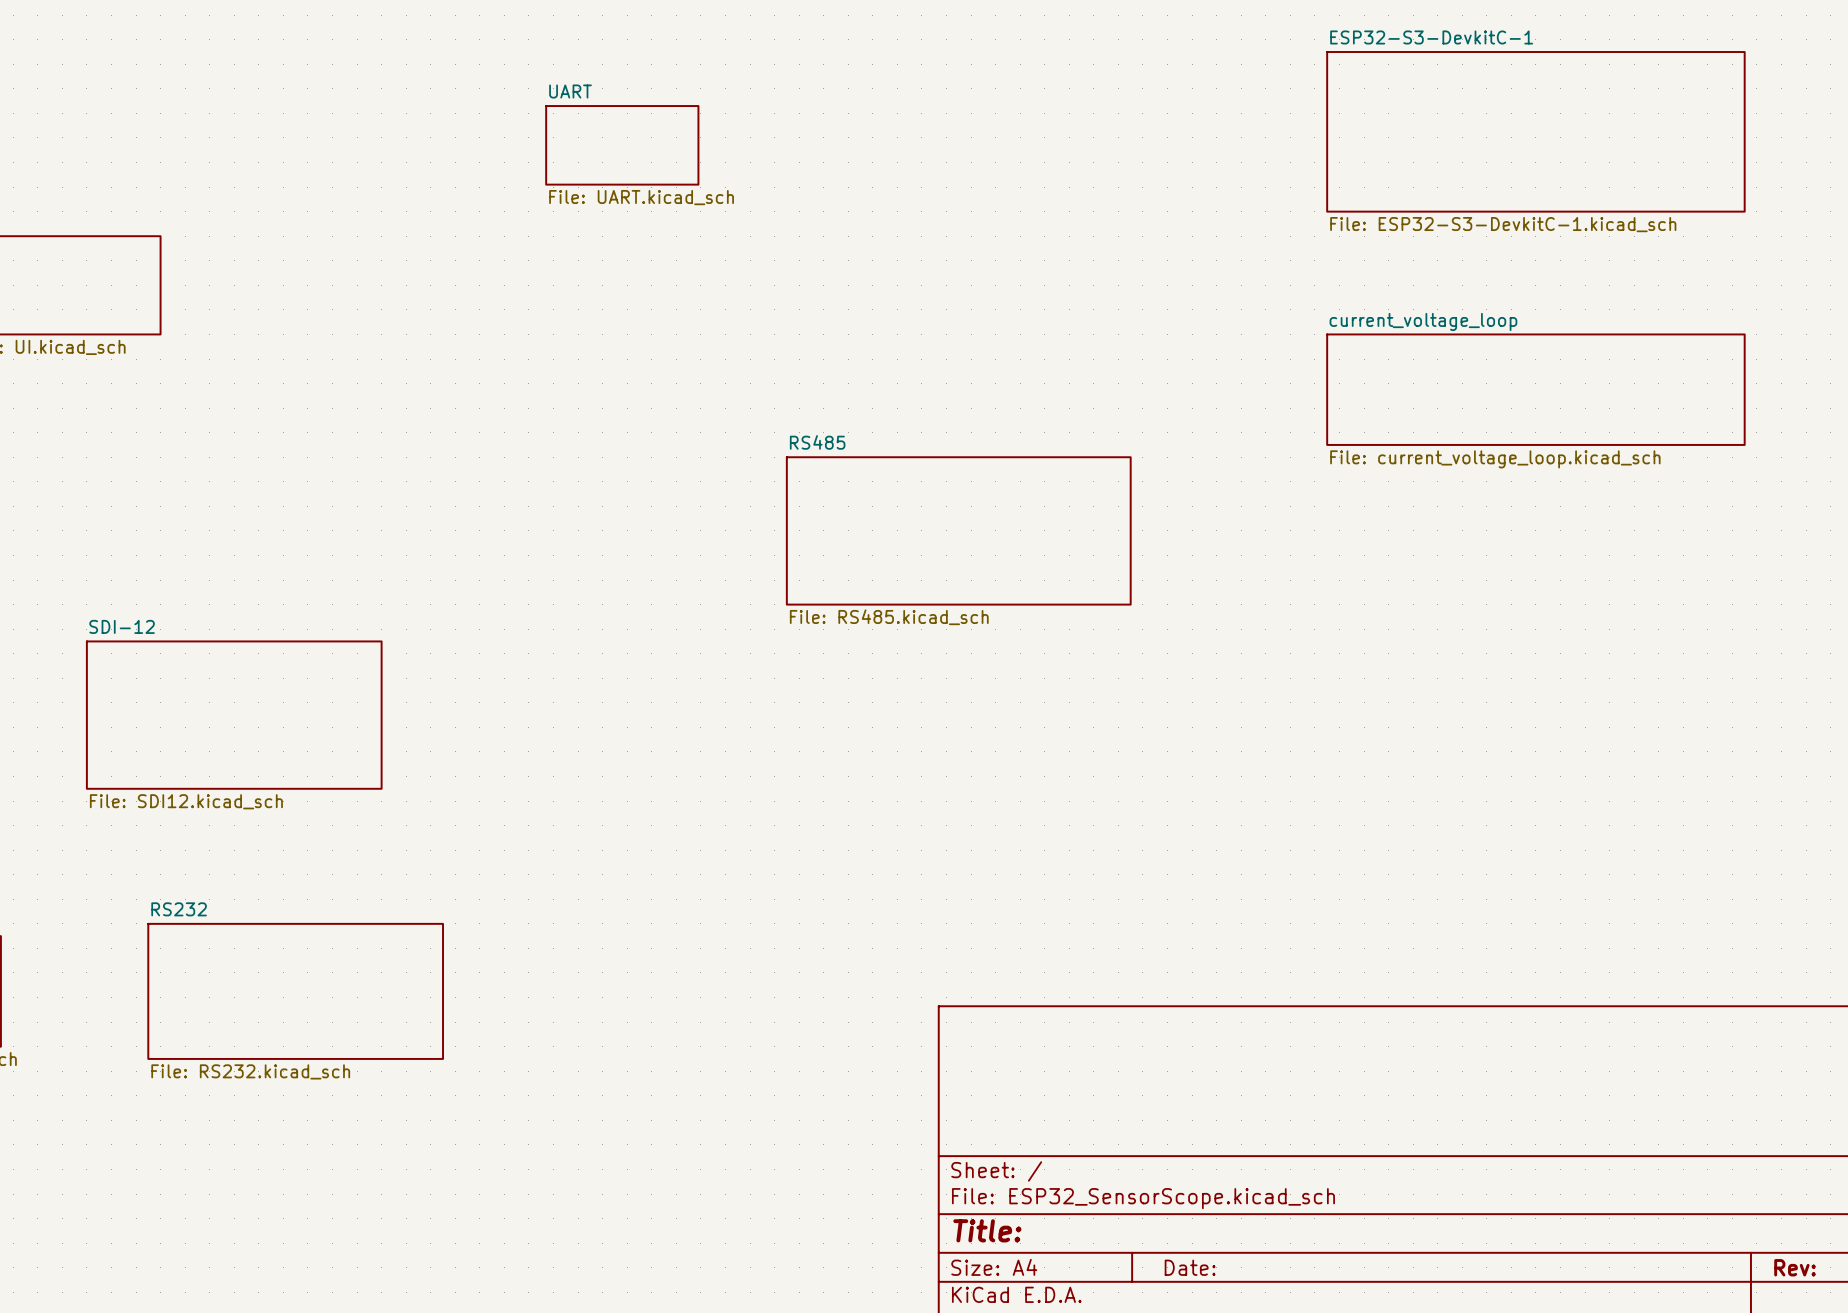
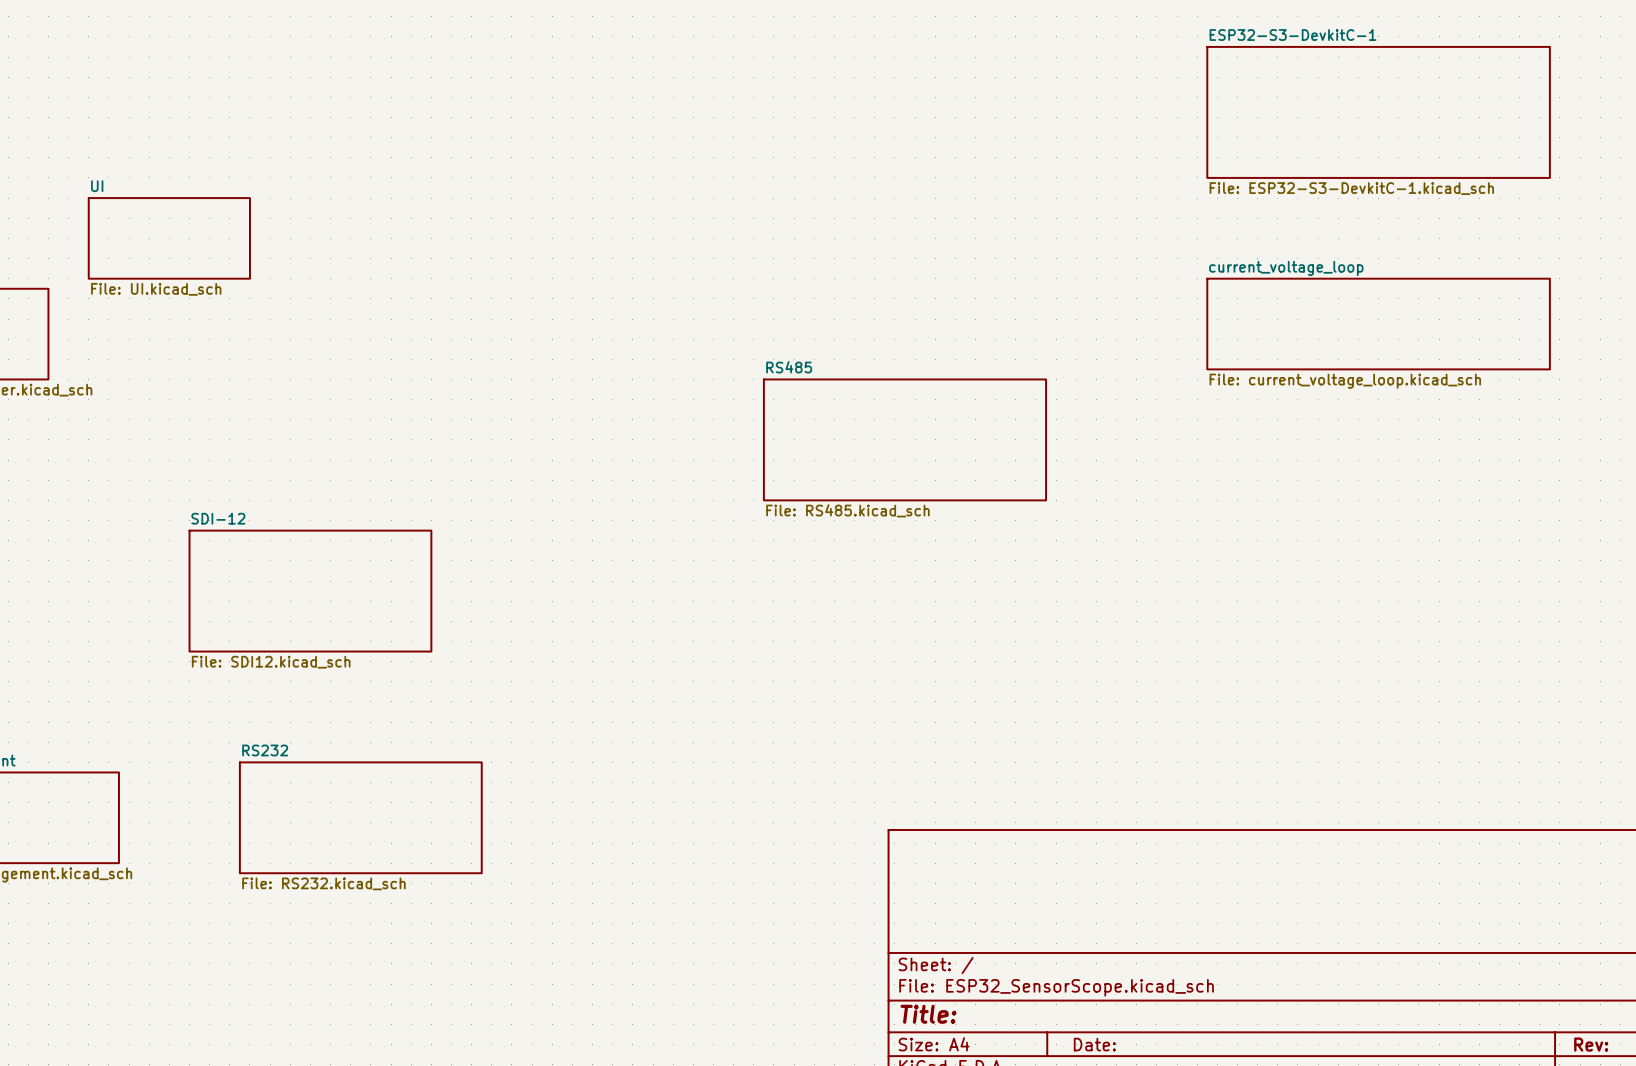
sheet UART: File: UART.kicad_sch (622, 145) -> none

